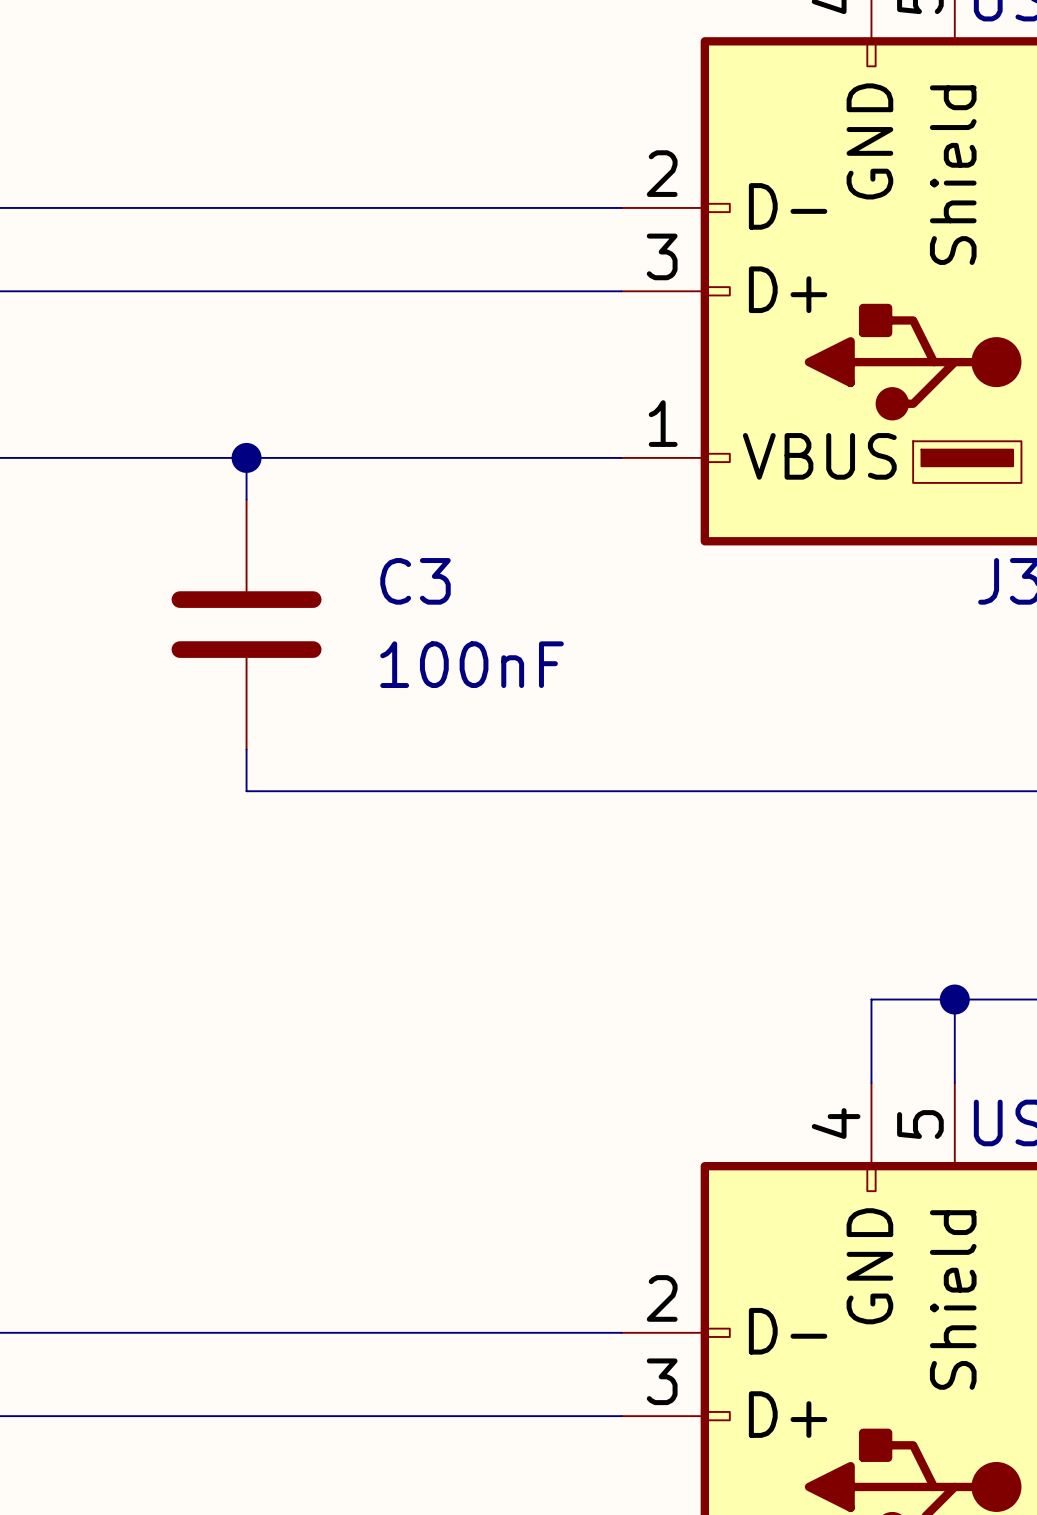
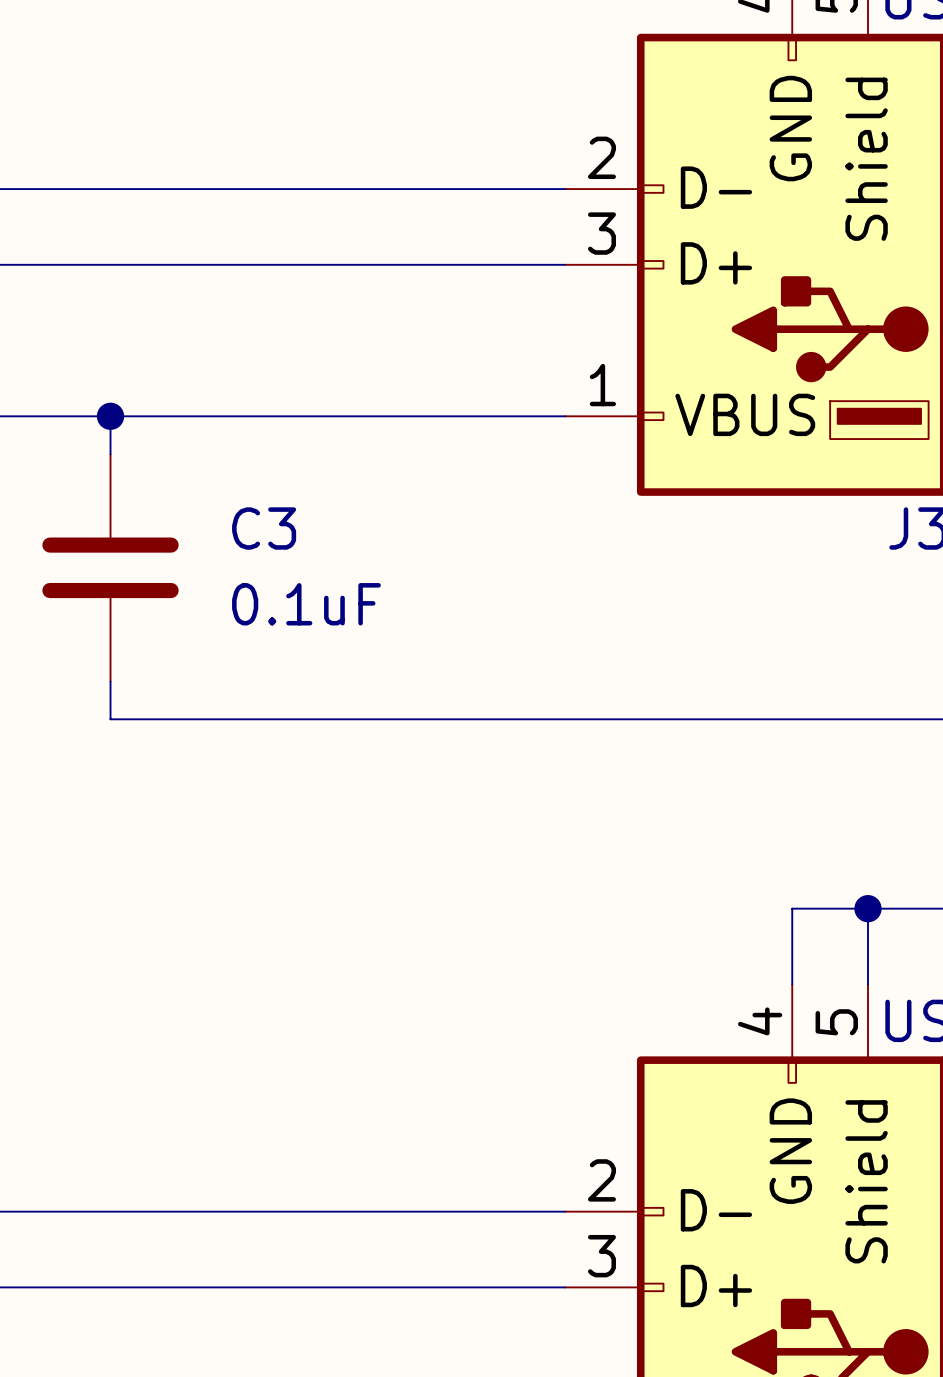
wire: (246, 457) (246, 499) -> (110, 416) (110, 454)
junction position: (246, 457) -> (110, 416)
C3 position: (246, 624) -> (110, 567)
C3 value: 100nF (472, 664) -> 0.1uF (306, 604)
wire: (246, 749) (246, 791) -> (110, 681) (110, 719) (224, 719)

